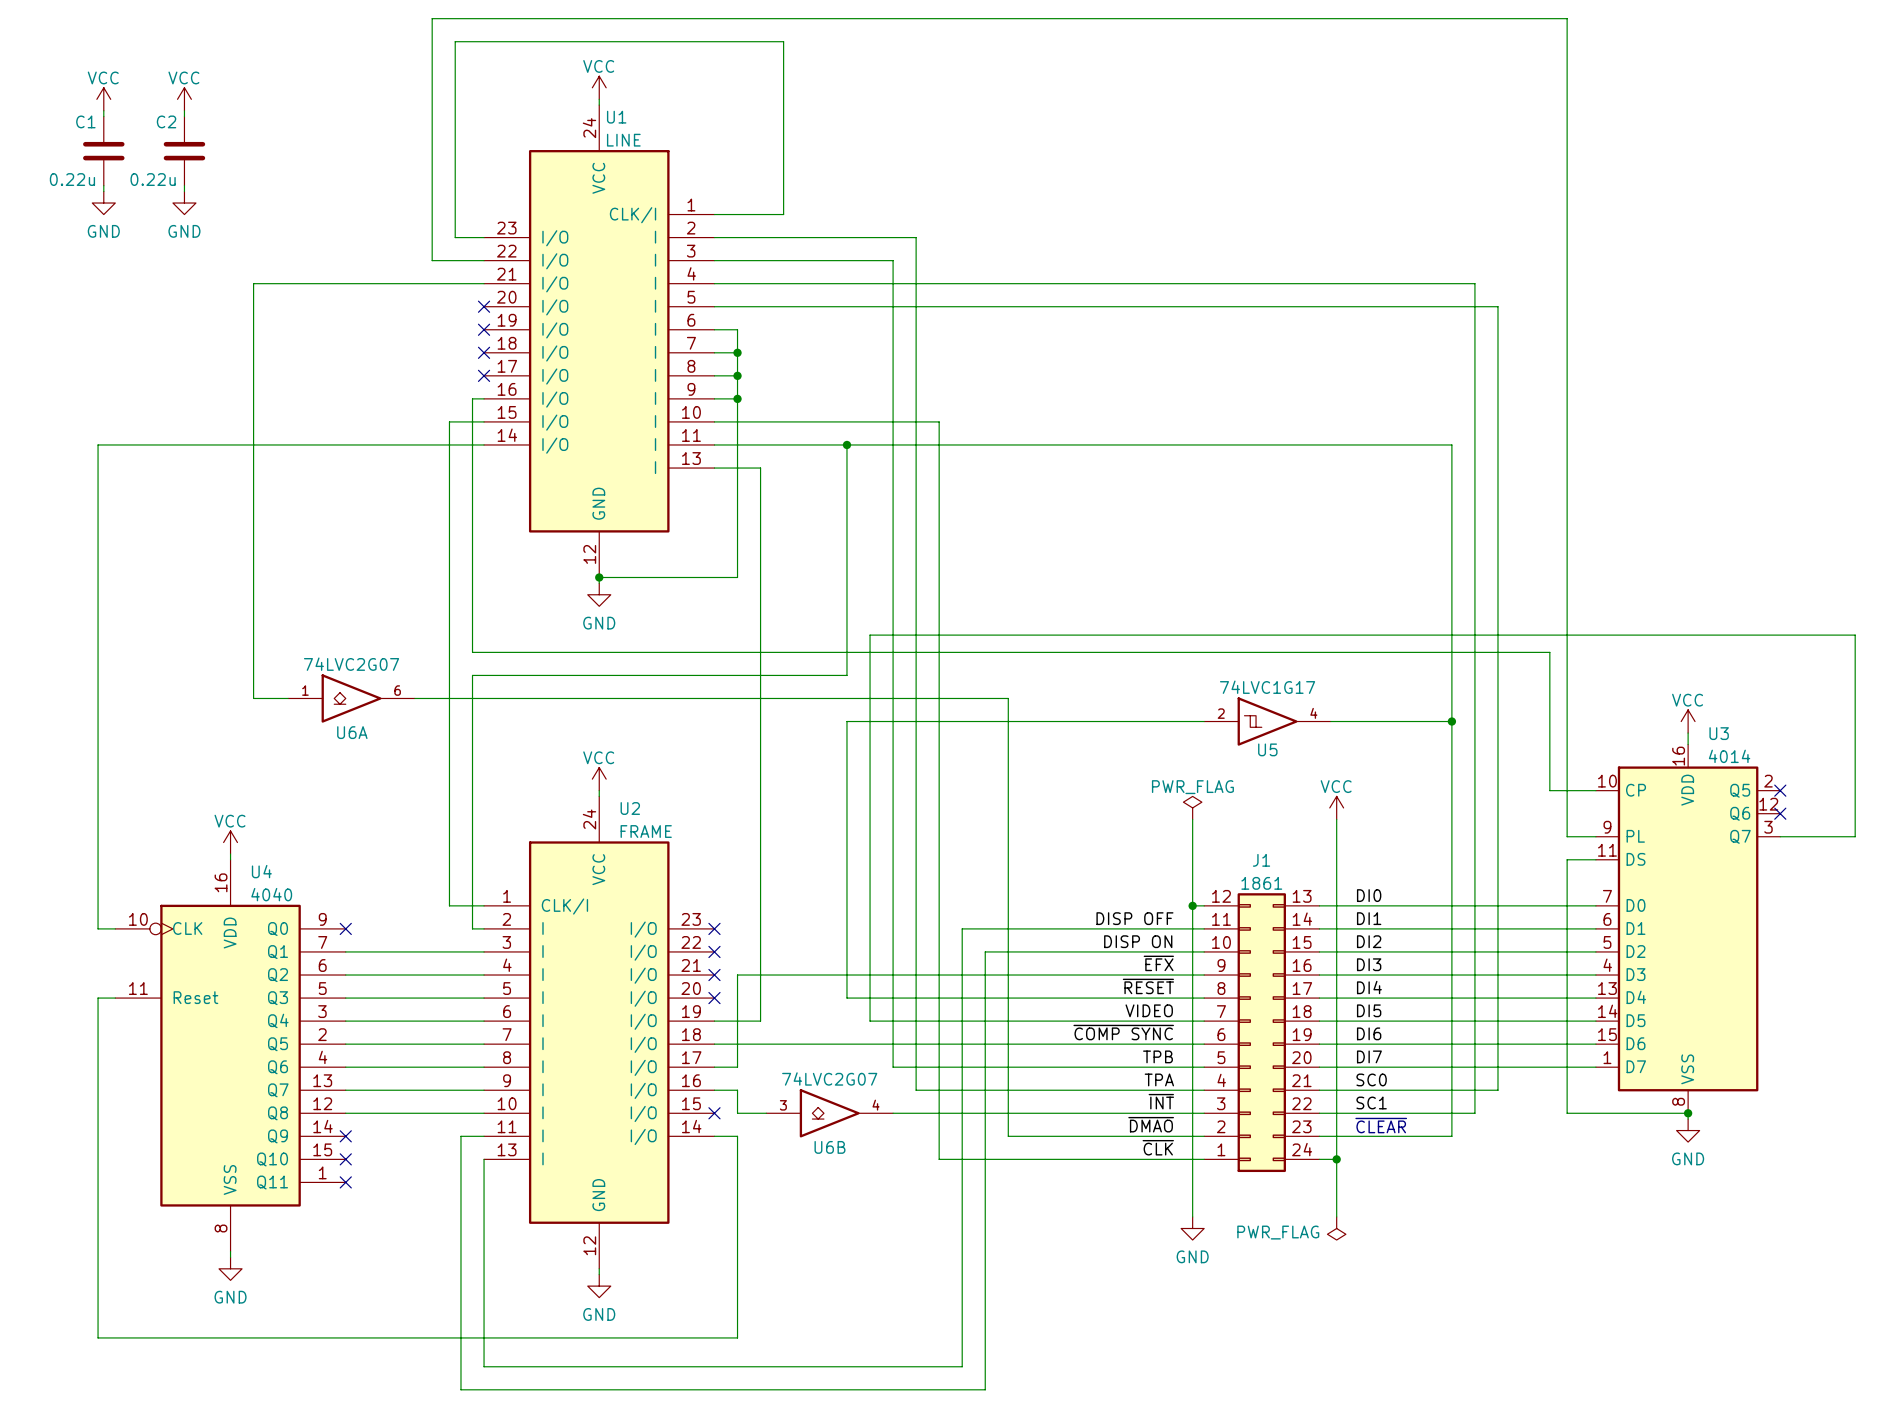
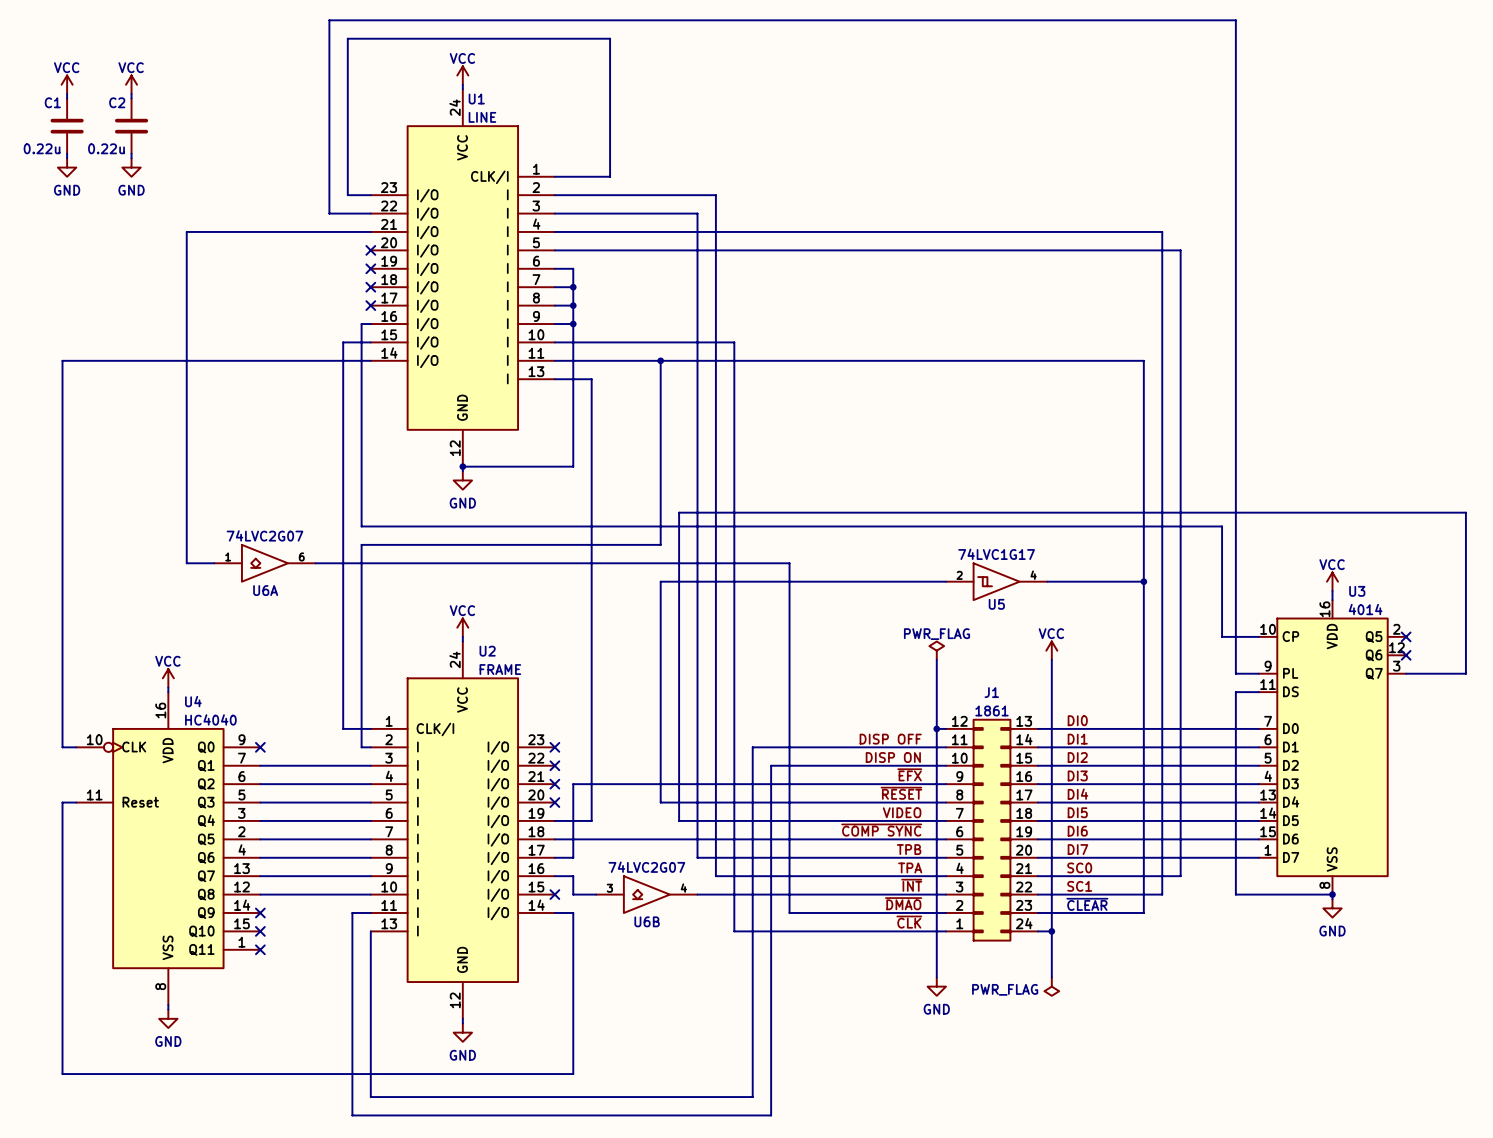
U4 value: 4040 (271, 894) -> HC4040 (210, 719)

